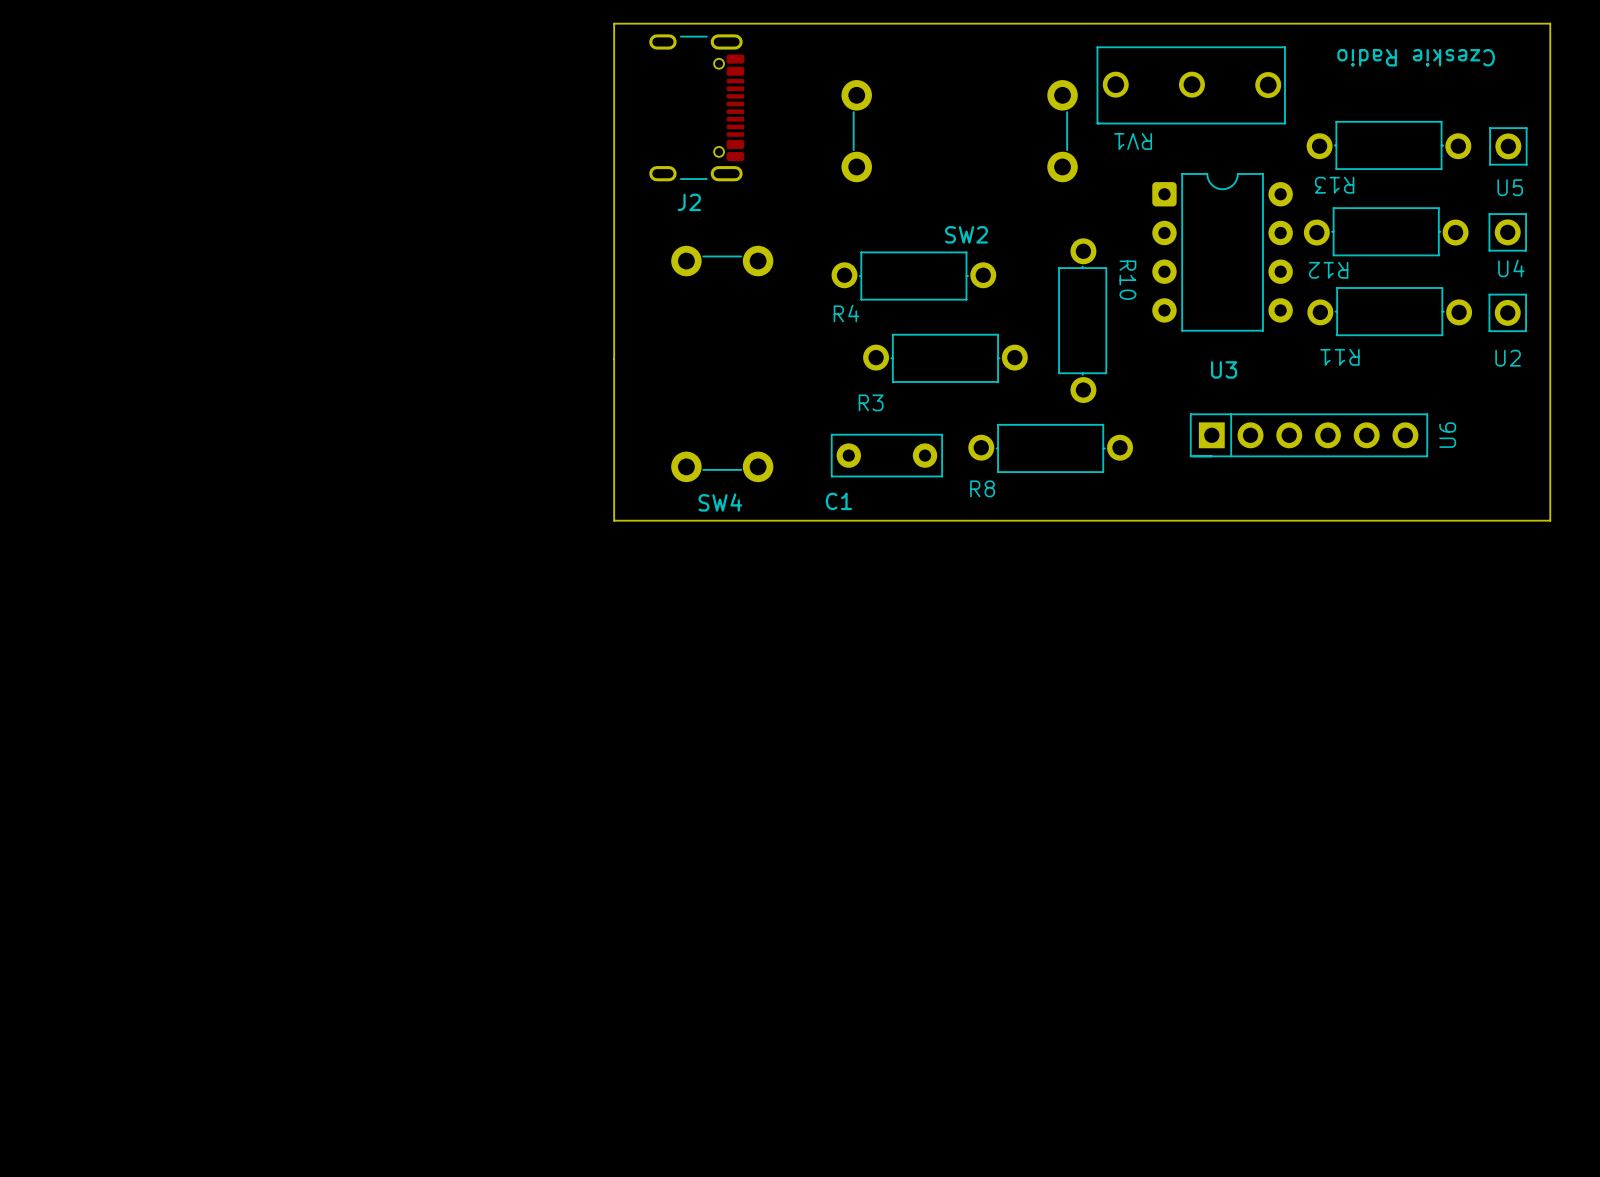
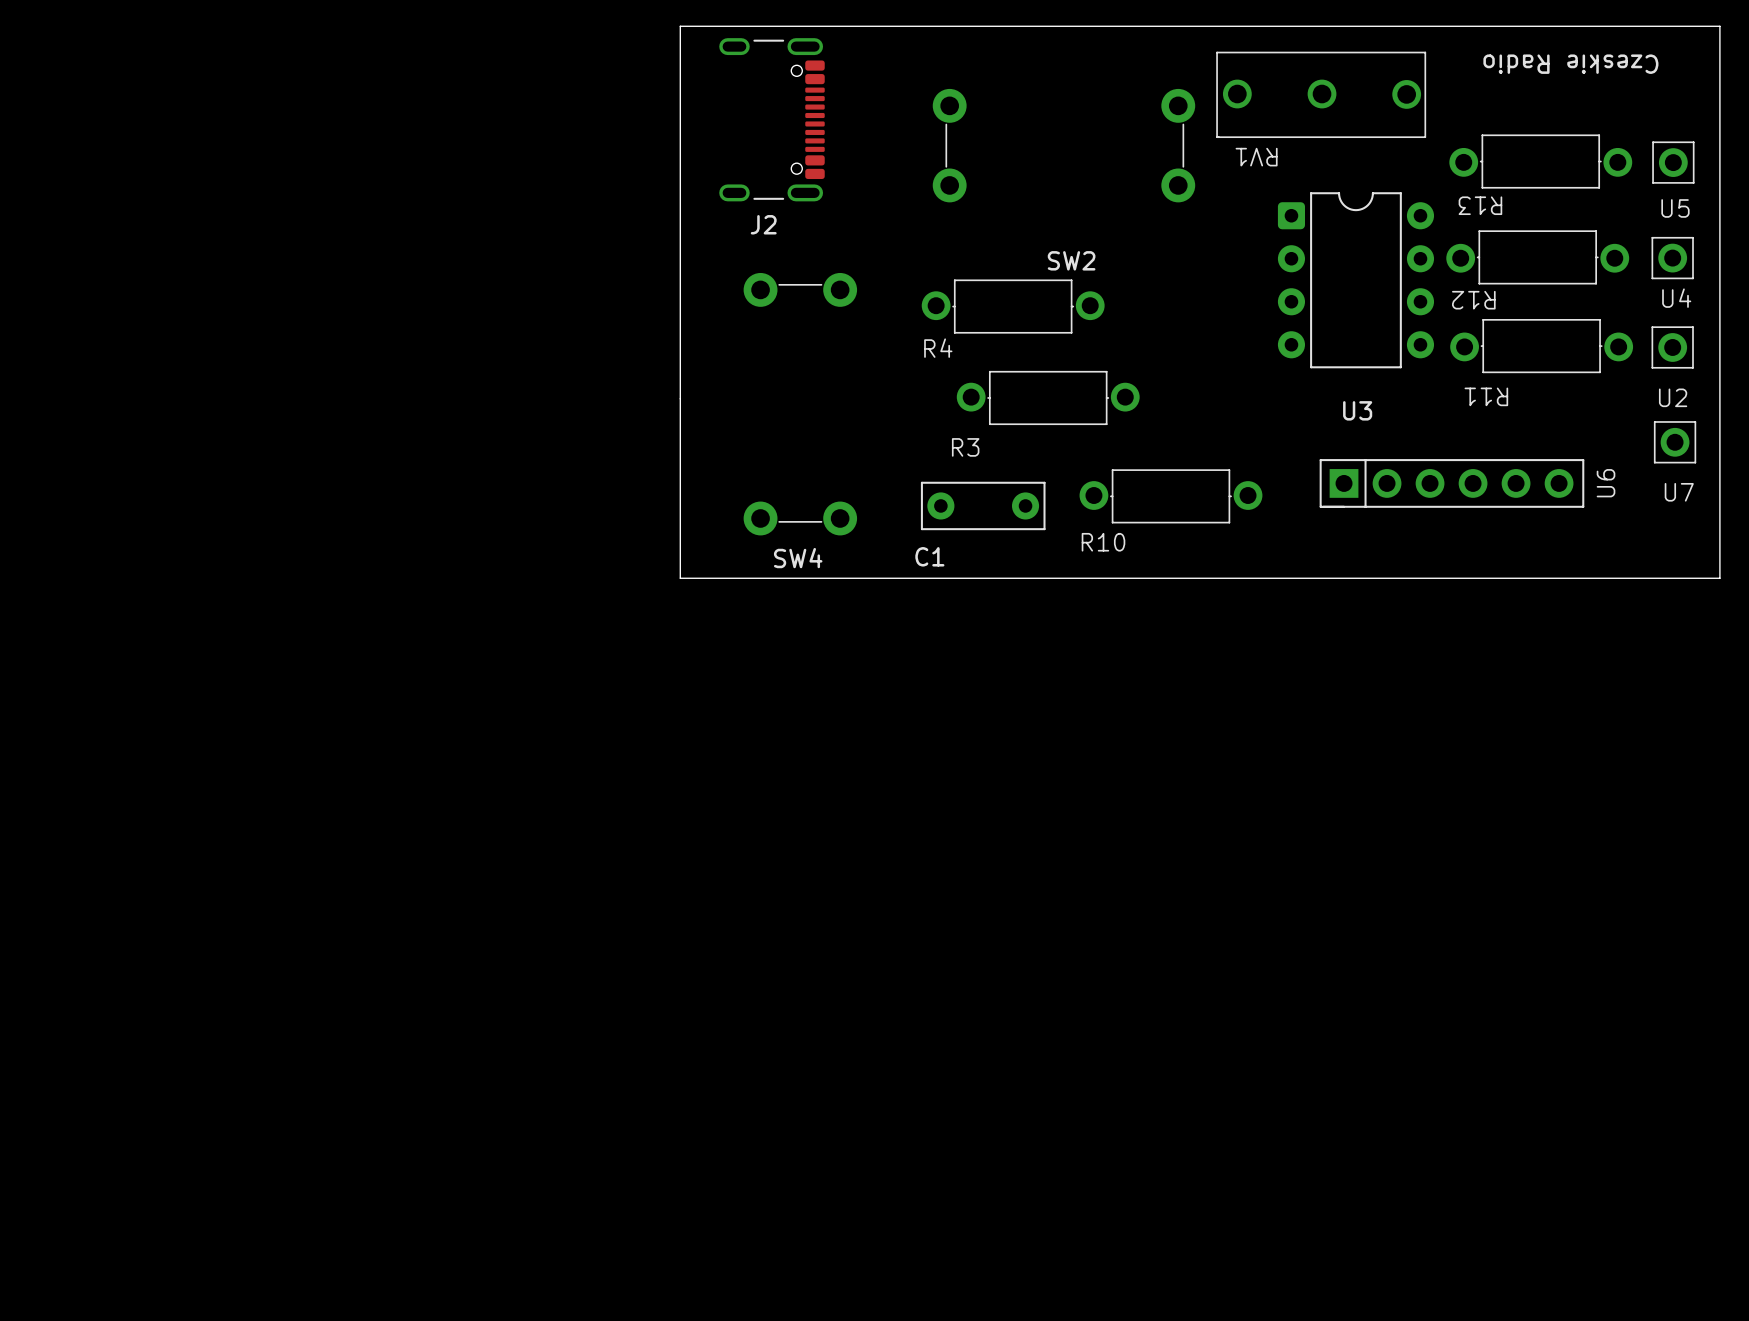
R10 name position: R10 (1127, 280) -> R10 (1103, 542)
R10 rotation: 0° (1082, 320) -> 90° counterclockwise (1170, 496)
R10 position: (1082, 320) -> (1170, 496)
U7: none -> (1675, 442)
R8: (1050, 448) -> none

